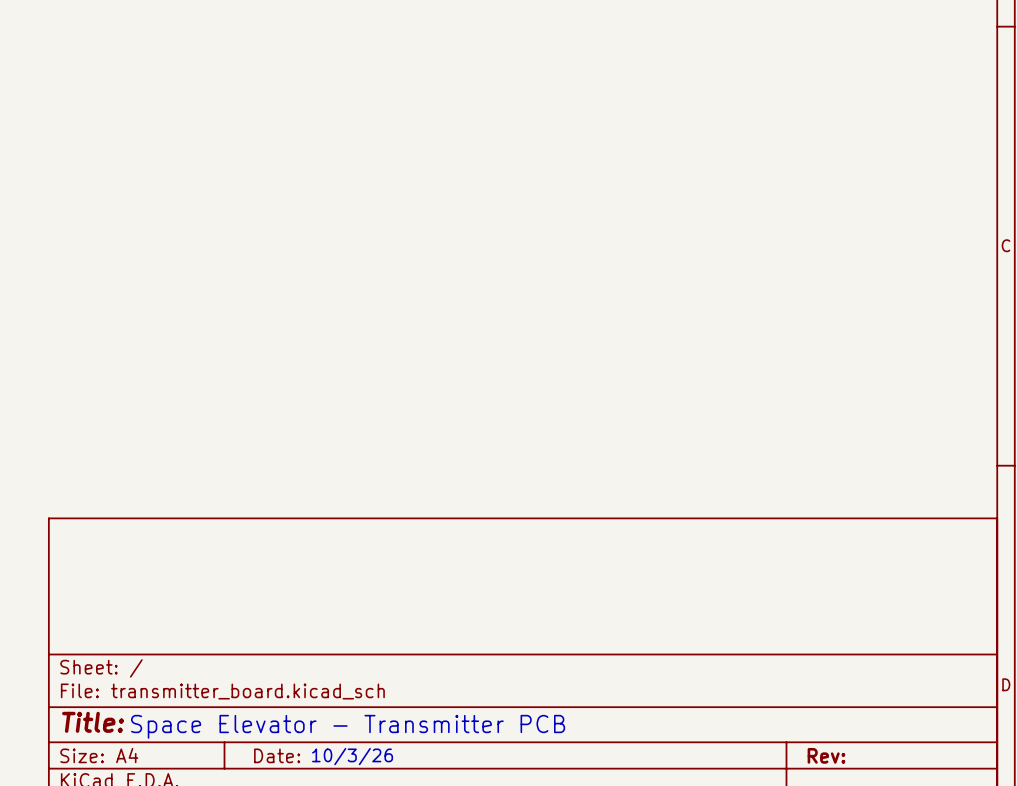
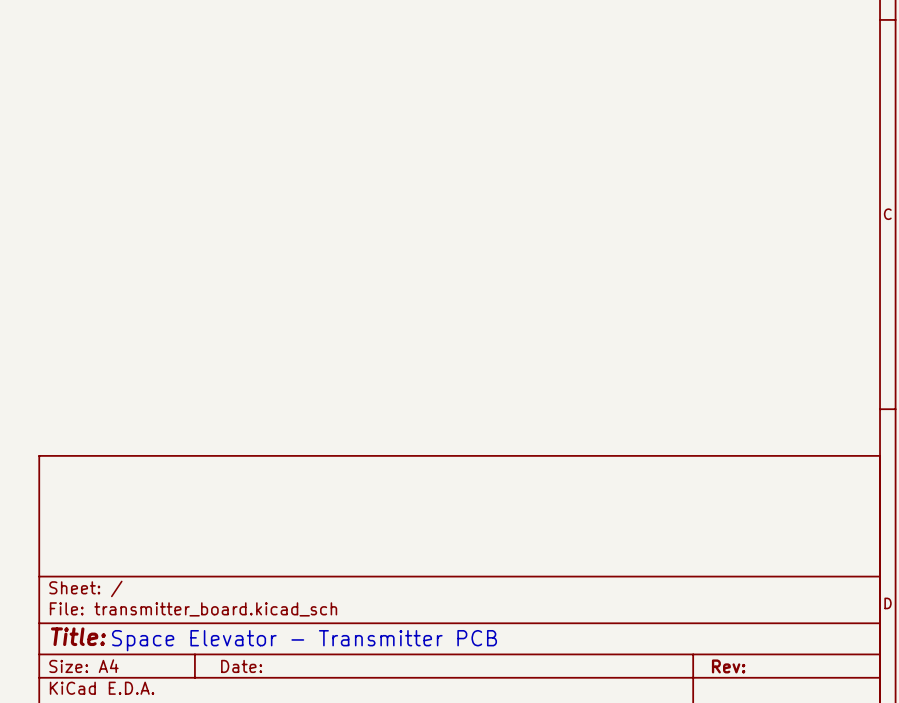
text: 10/3/26 (352, 756) -> none

